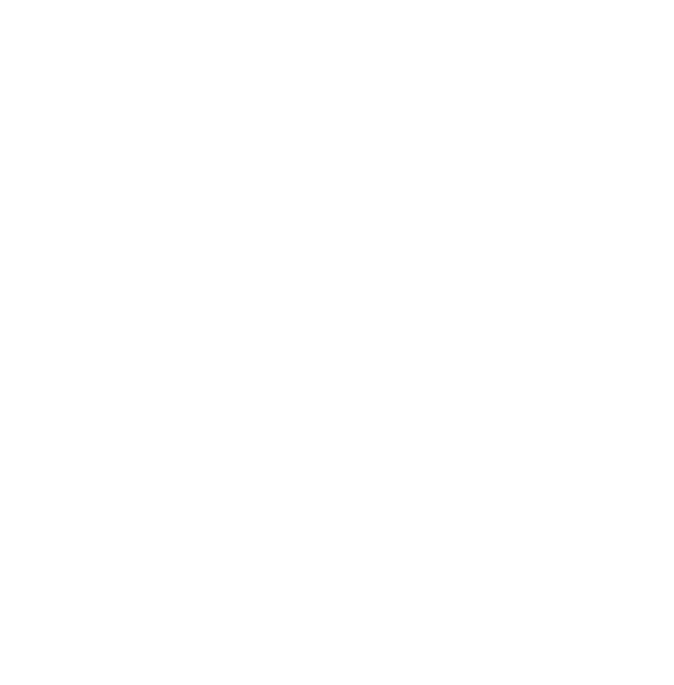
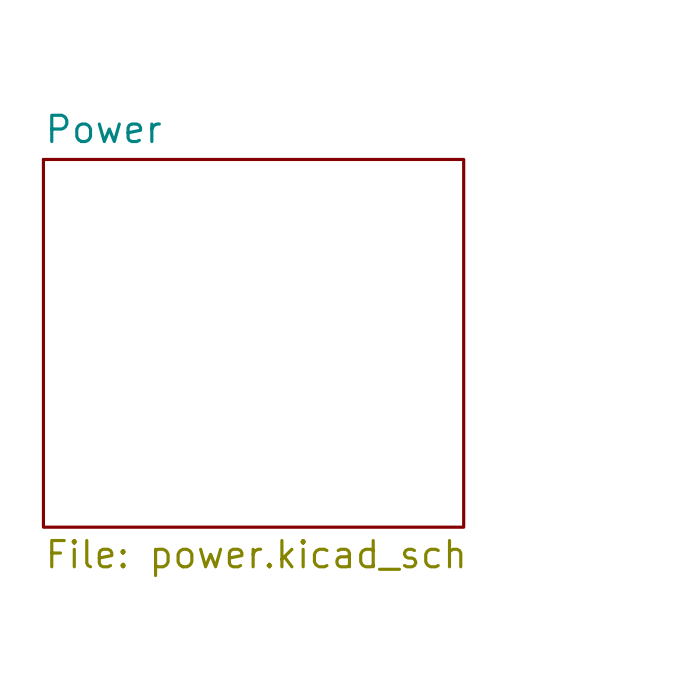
sheet Power: none -> File: power.kicad_sch (253, 343)

